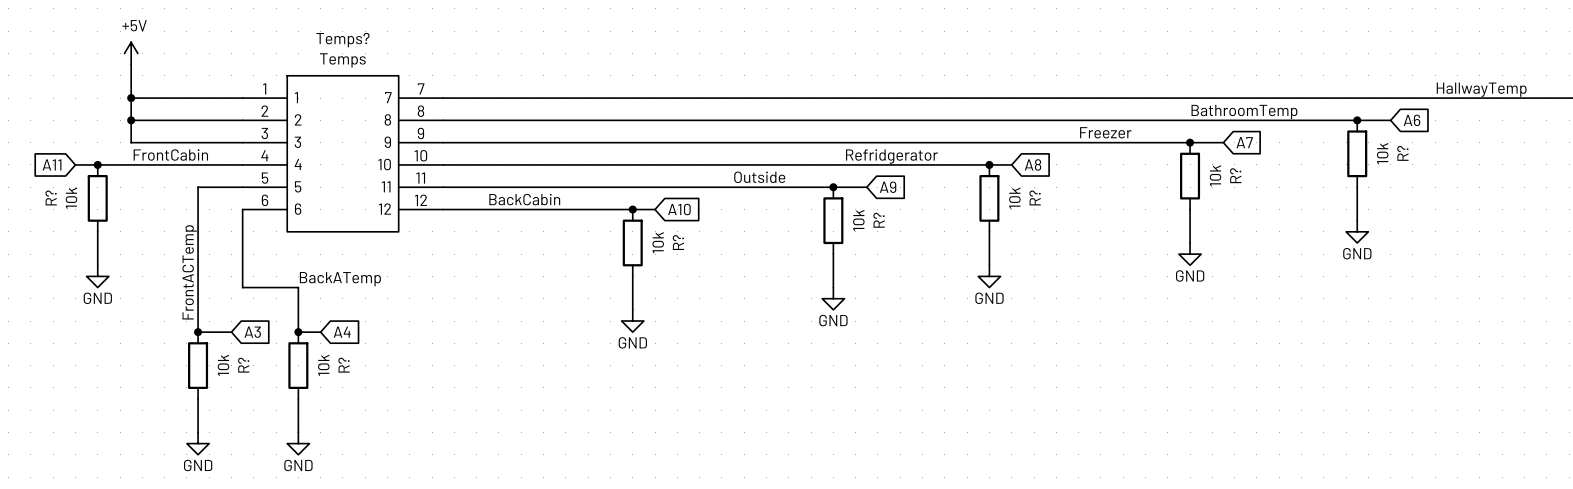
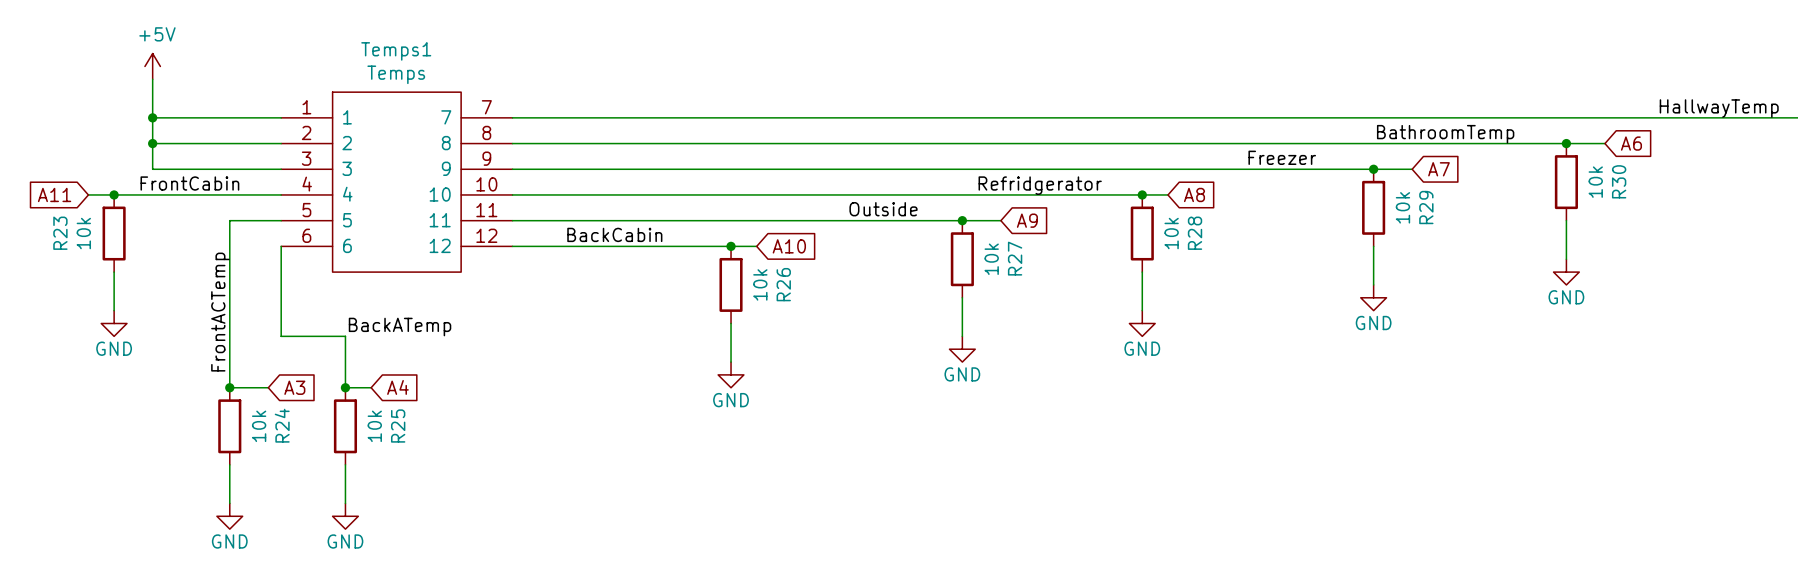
Temps? name: Temps? (342, 40) -> Temps1 (396, 51)
R? name: R? (1402, 153) -> R30 (1619, 181)
R? name: R? (1235, 175) -> R29 (1426, 207)
R? name: R? (51, 197) -> R23 (60, 233)
R? name: R? (1035, 197) -> R28 (1195, 233)
R? name: R? (879, 220) -> R27 (1015, 258)
R? name: R? (678, 242) -> R26 (783, 284)
R? name: R? (243, 365) -> R24 (282, 425)
R? name: R? (344, 365) -> R25 (398, 426)

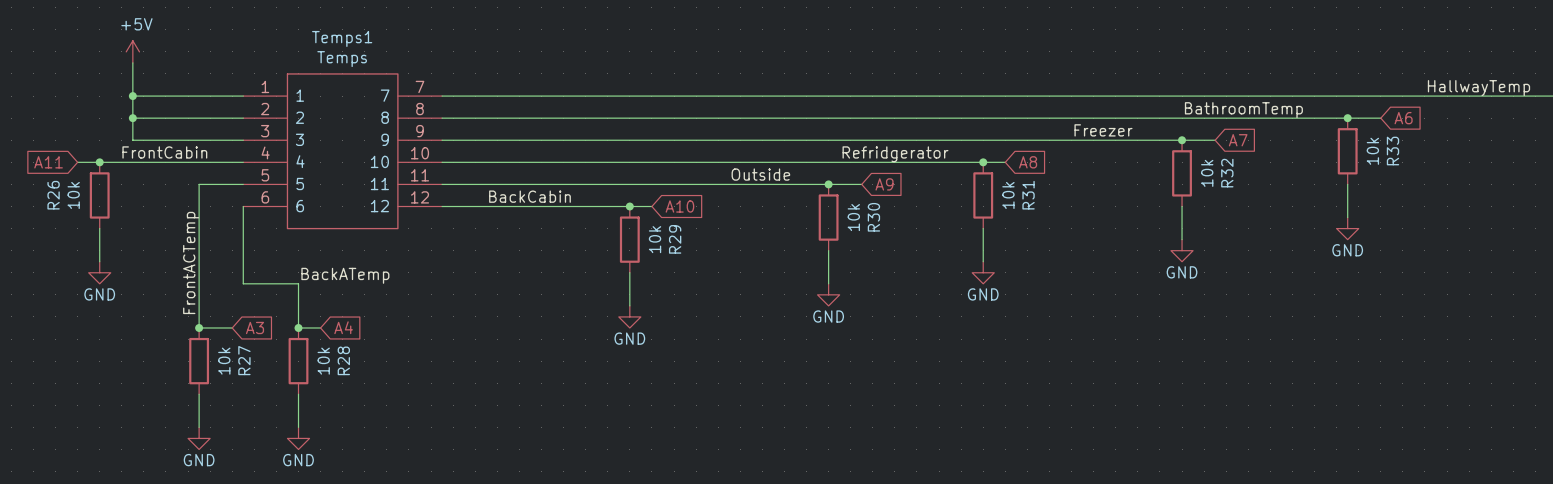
R30 name: R30 (1619, 181) -> R33 (1392, 151)
R29 name: R29 (1426, 207) -> R32 (1227, 173)
R23 name: R23 (60, 233) -> R26 (53, 195)
R28 name: R28 (1195, 233) -> R31 (1028, 195)
R27 name: R27 (1015, 258) -> R30 (873, 217)
R26 name: R26 (783, 284) -> R29 (675, 239)
R24 name: R24 (282, 425) -> R27 (244, 360)
R25 name: R25 (398, 426) -> R28 (343, 360)

